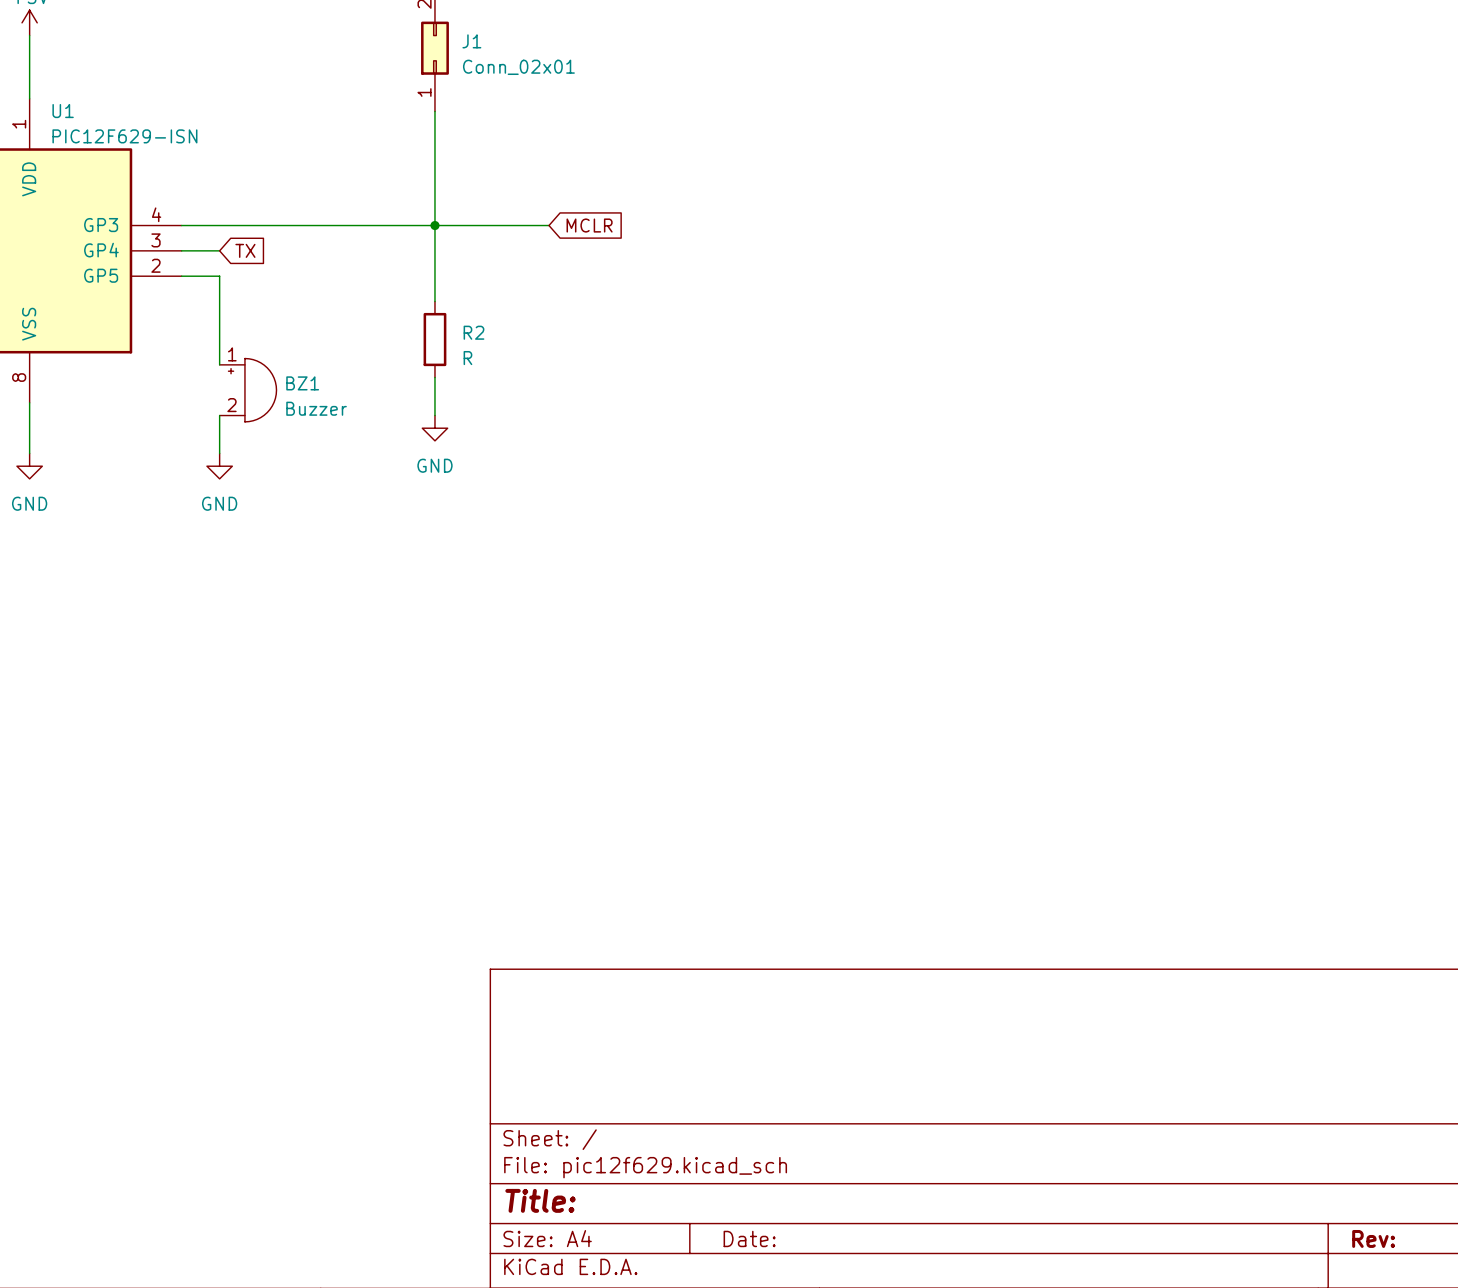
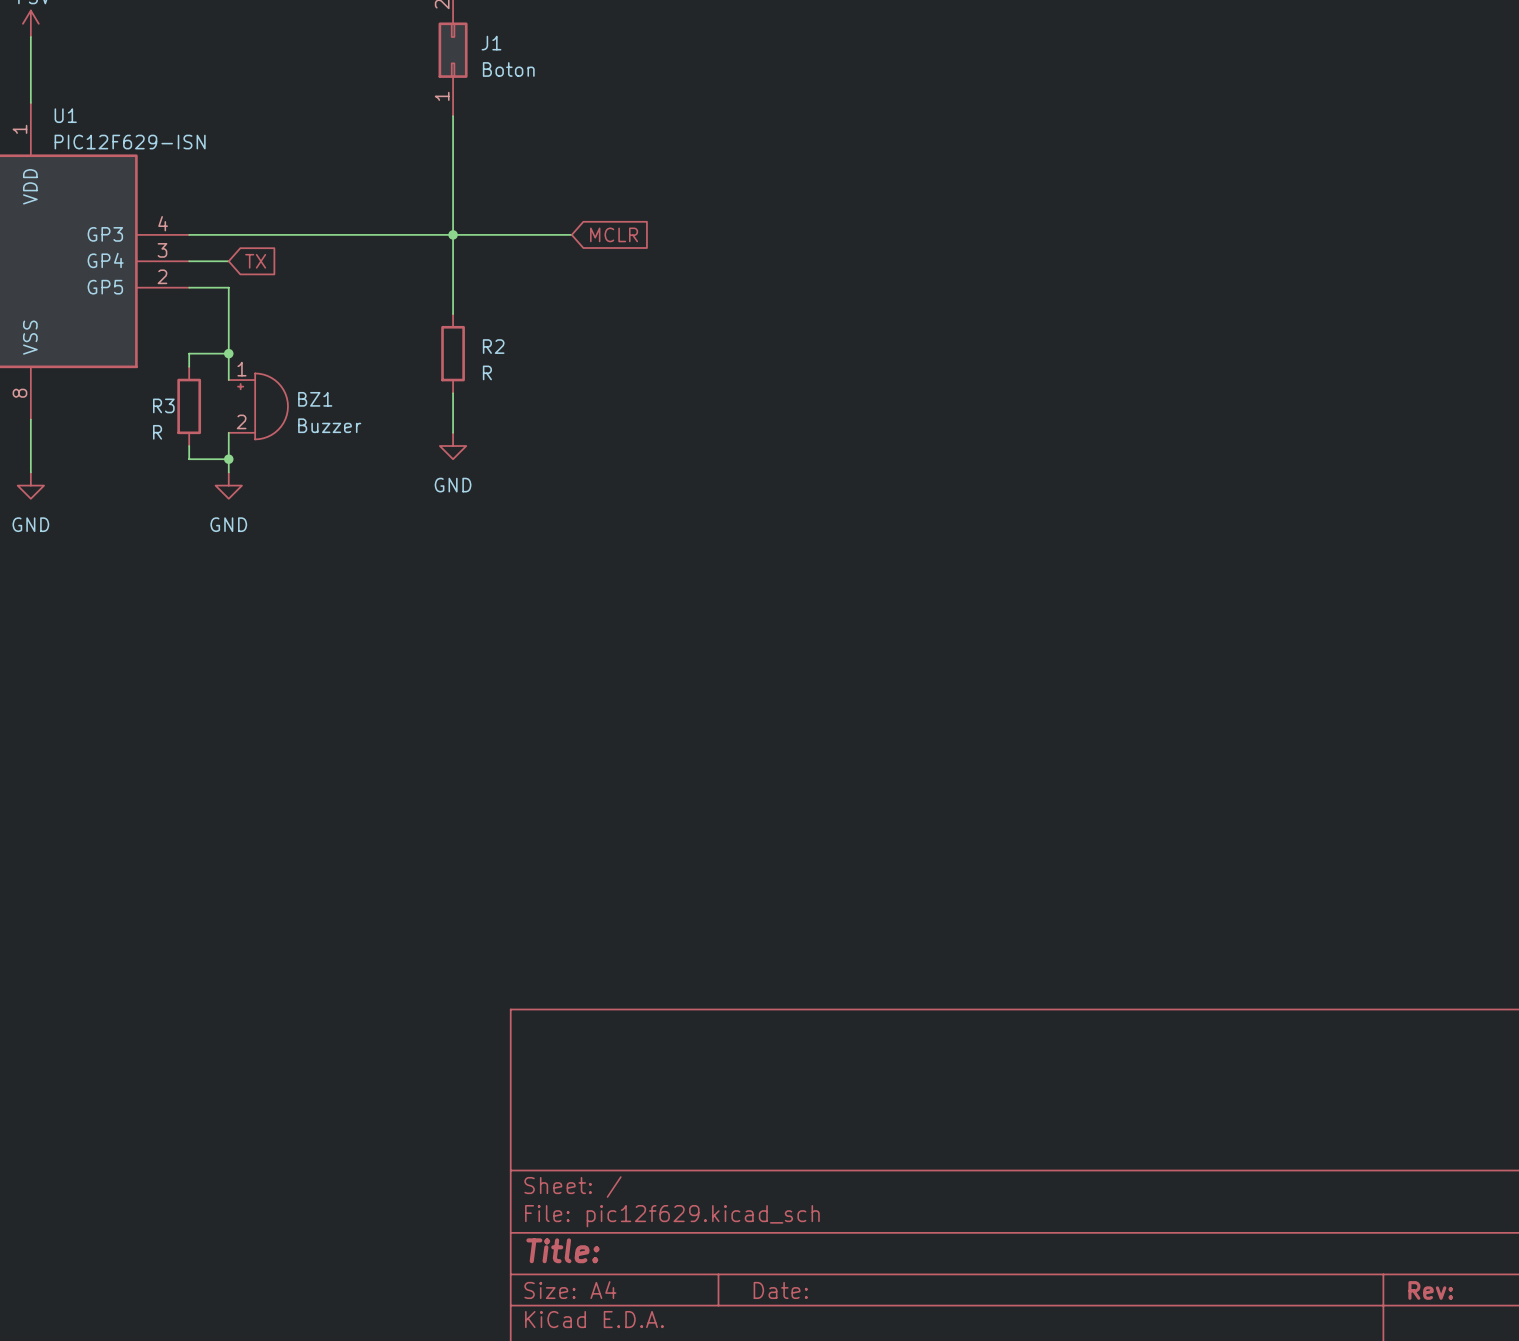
J1 value: Conn_02x01 (518, 67) -> Boton (508, 69)
wire: none -> (228, 353) (189, 353) (189, 366)
junction: none -> (228, 353)
R3: none -> R (189, 406)
wire: none -> (189, 446) (189, 459) (228, 459)
junction: none -> (228, 459)

